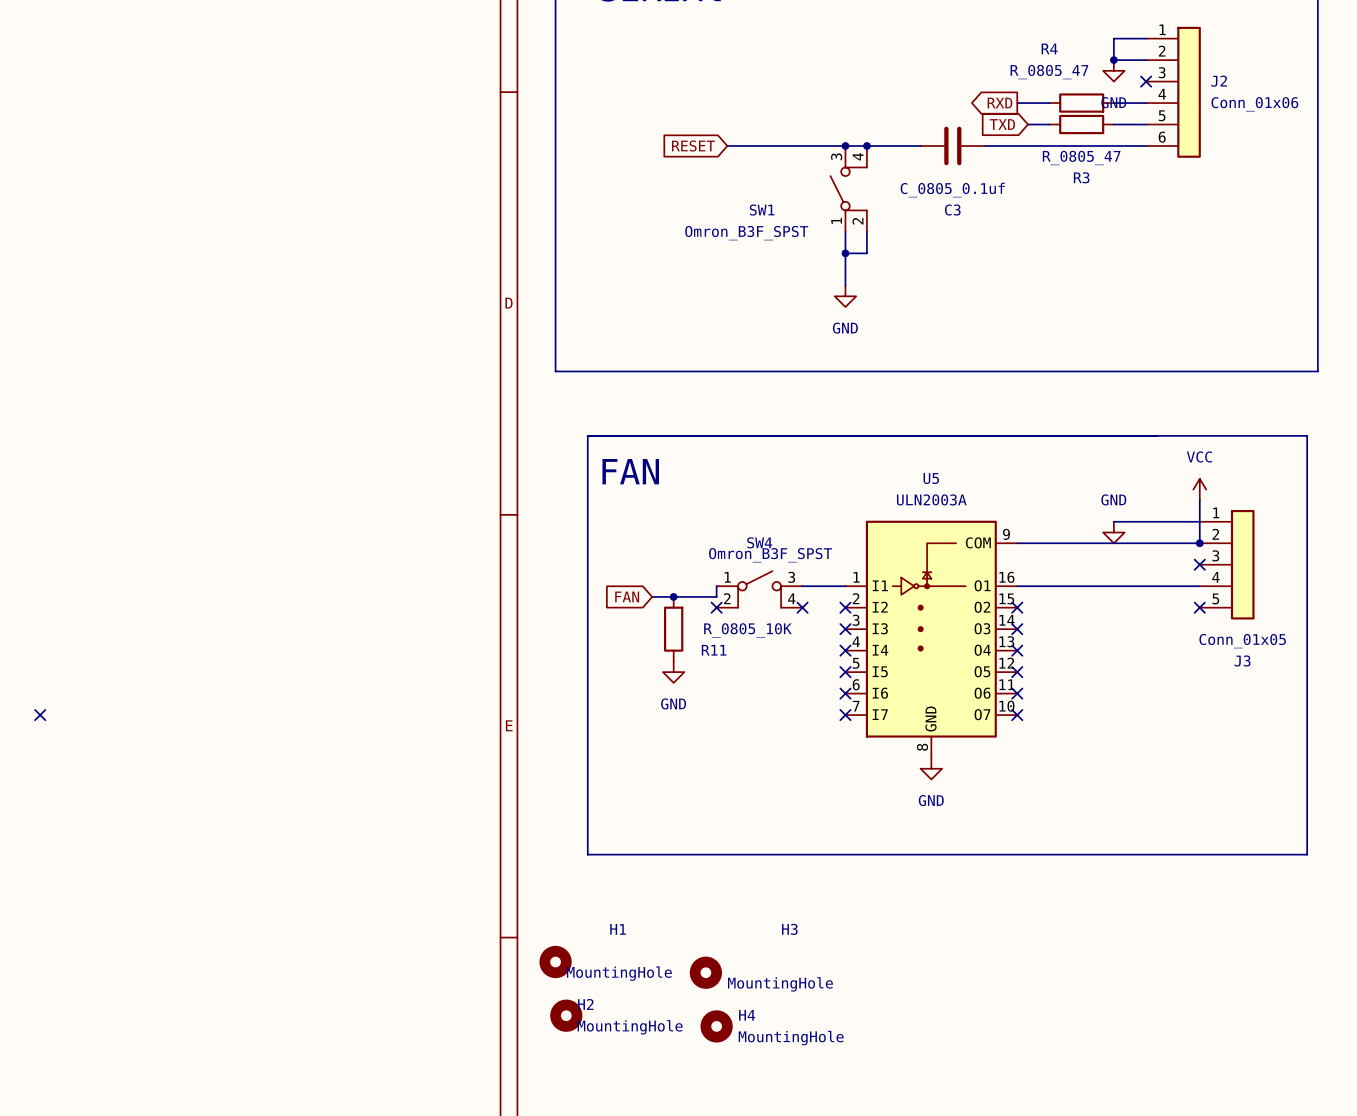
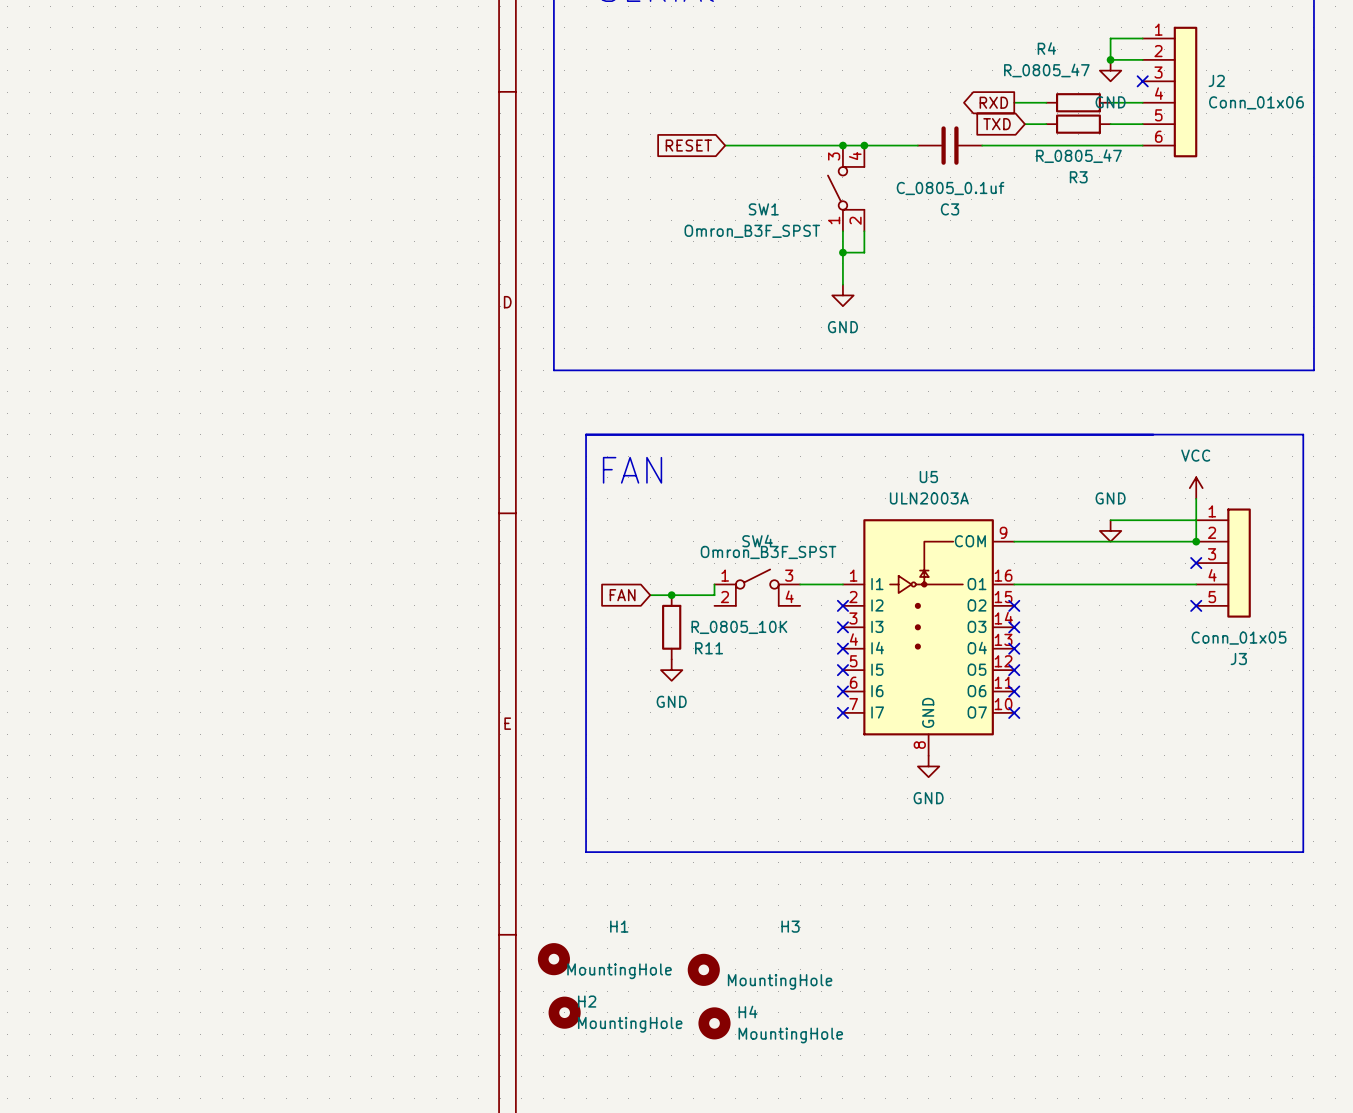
no-connect mark: (716, 607) -> none
no-connect mark: (802, 607) -> none
no-connect mark: (40, 715) -> none

